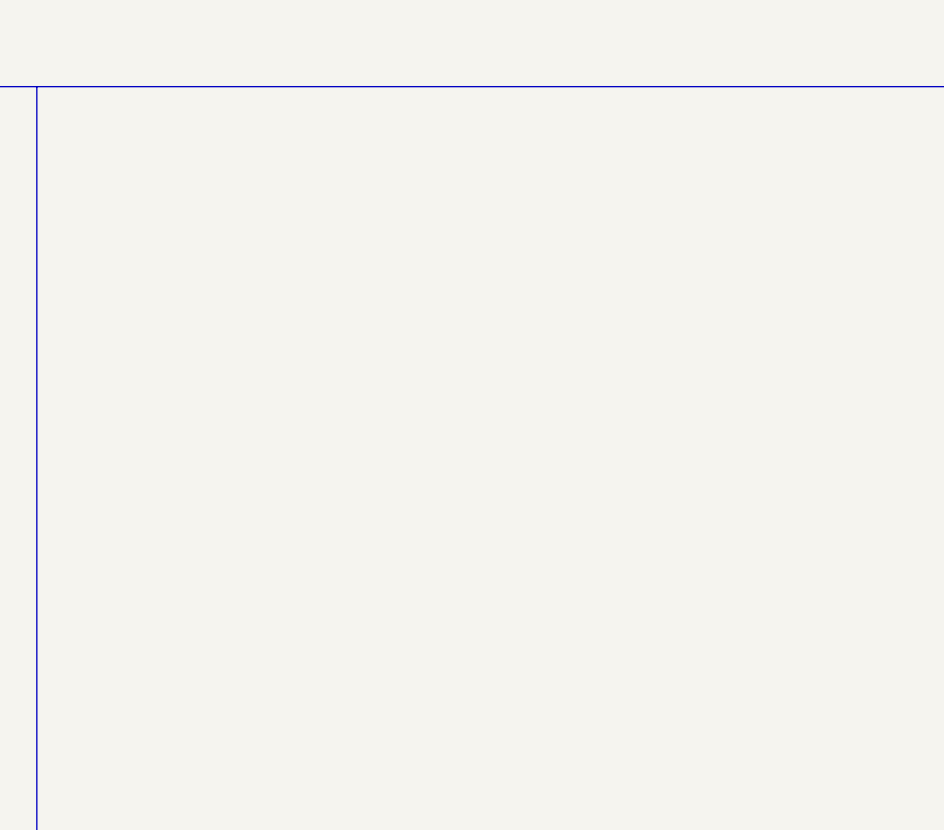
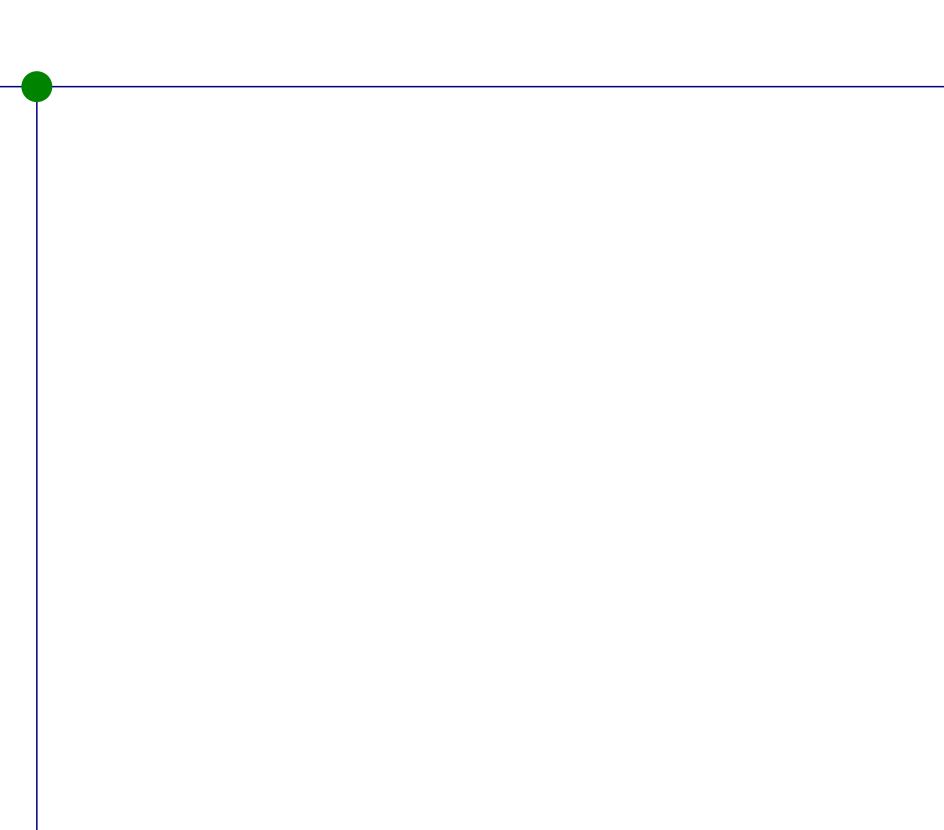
junction: none -> (36, 86)

